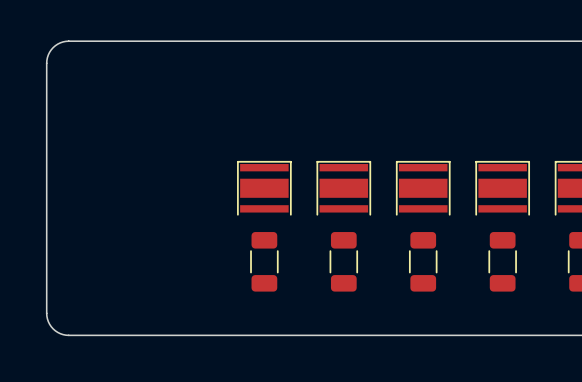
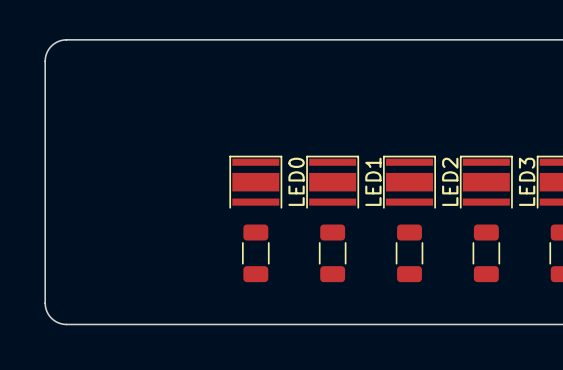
LED0 name: none -> LED0 (296, 181)
LED1 name: none -> LED1 (373, 181)
LED2 name: none -> LED2 (450, 181)
LED3 name: none -> LED3 (527, 181)

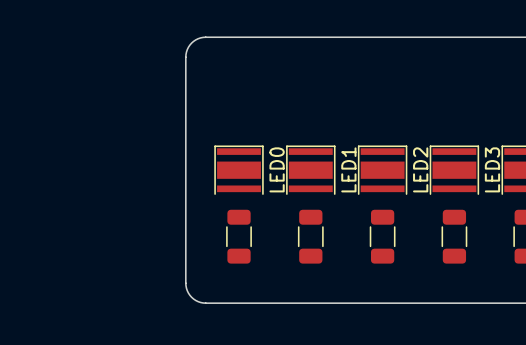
board edge: (220, 39) (63, 40) (51, 46) (46, 53) (45, 61) (45, 303) (48, 313) (55, 321) (66, 324) (220, 324) -> (205, 37) (198, 38) (191, 43) (187, 49) (185, 57) (185, 285) (191, 297) (198, 301) (205, 303)

